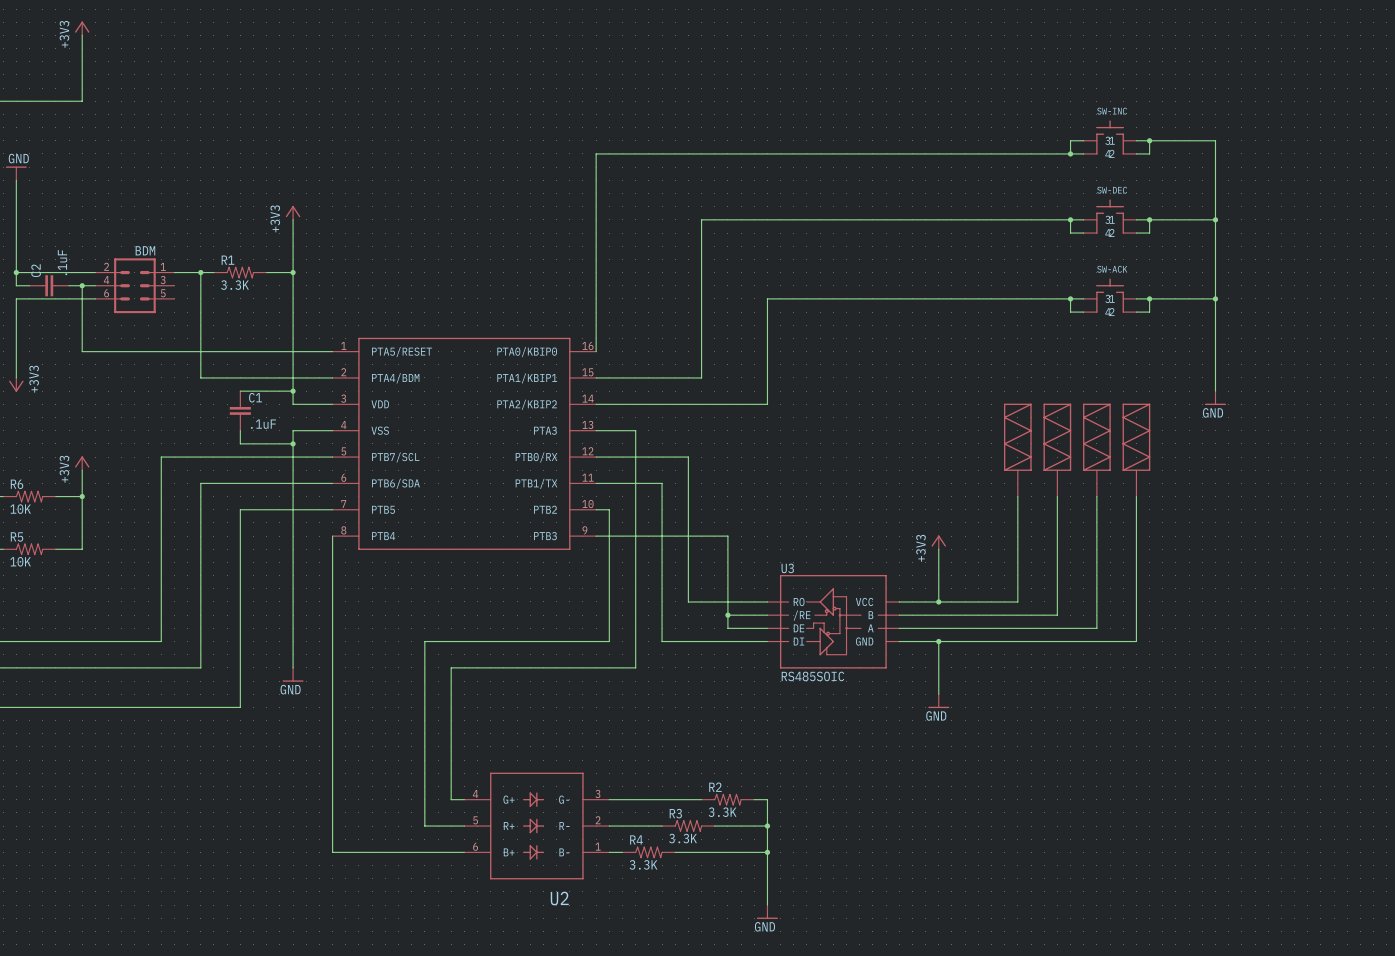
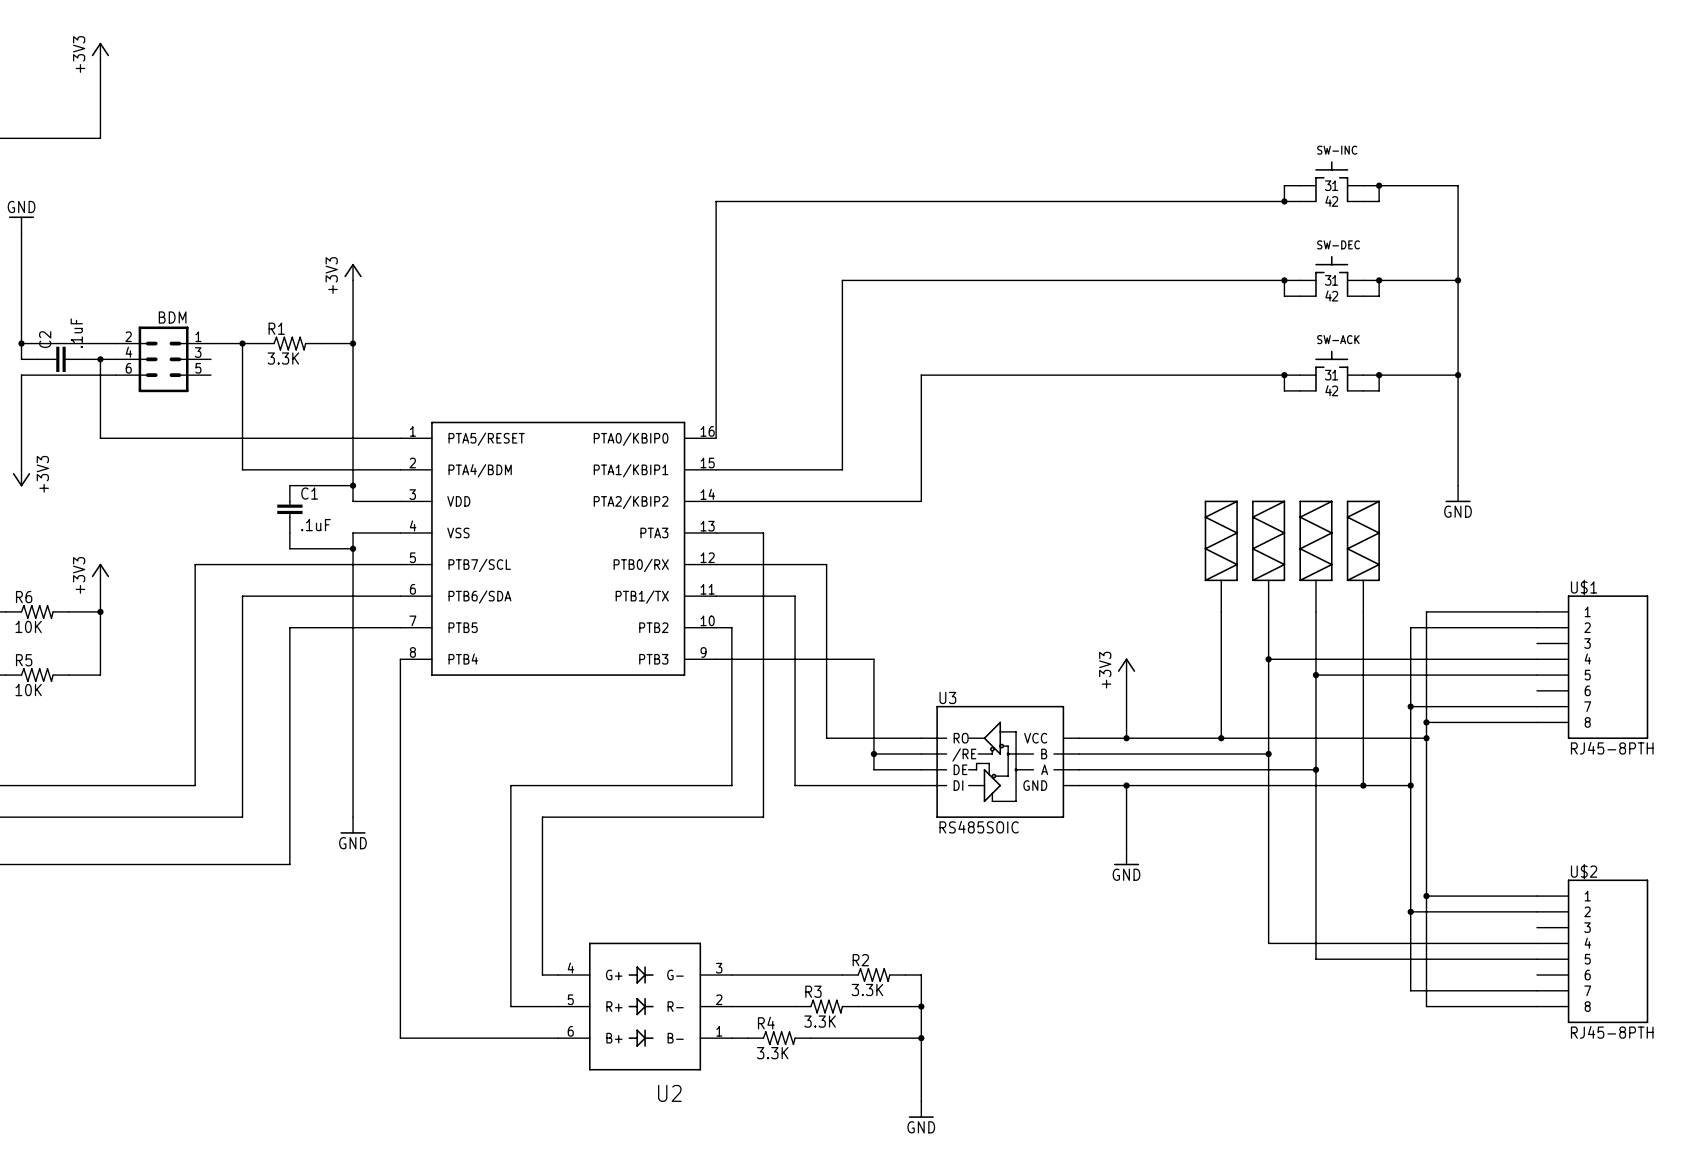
wire: none -> (1536, 611) (1426, 611) (1426, 1006) (1536, 1006)
wire: none -> (1536, 627) (1410, 627) (1410, 990) (1536, 990)
wire: none -> (1268, 659) (1536, 659)
junction: none -> (1268, 659)
U$1: none -> RJ45-8PTH (1592, 667)
wire: none -> (1315, 675) (1536, 675)
junction: none -> (1315, 675)
wire: none -> (1410, 706) (1536, 706)
junction: none -> (1410, 706)
wire: none -> (1426, 722) (1536, 722)
junction: none -> (1426, 722)
wire: none -> (1221, 738) (1426, 738)
junction: none -> (1221, 738)
junction: none -> (1426, 738)
wire: none -> (1268, 754) (1268, 943) (1536, 943)
junction: none -> (1268, 754)
wire: none -> (1315, 769) (1315, 959) (1536, 959)
junction: none -> (1315, 769)
wire: none -> (1363, 785) (1410, 785)
junction: none -> (1363, 785)
junction: none -> (1410, 785)
wire: none -> (1426, 896) (1536, 896)
junction: none -> (1426, 896)
wire: none -> (1410, 911) (1536, 911)
junction: none -> (1410, 911)
U$2: none -> RJ45-8PTH (1592, 951)

